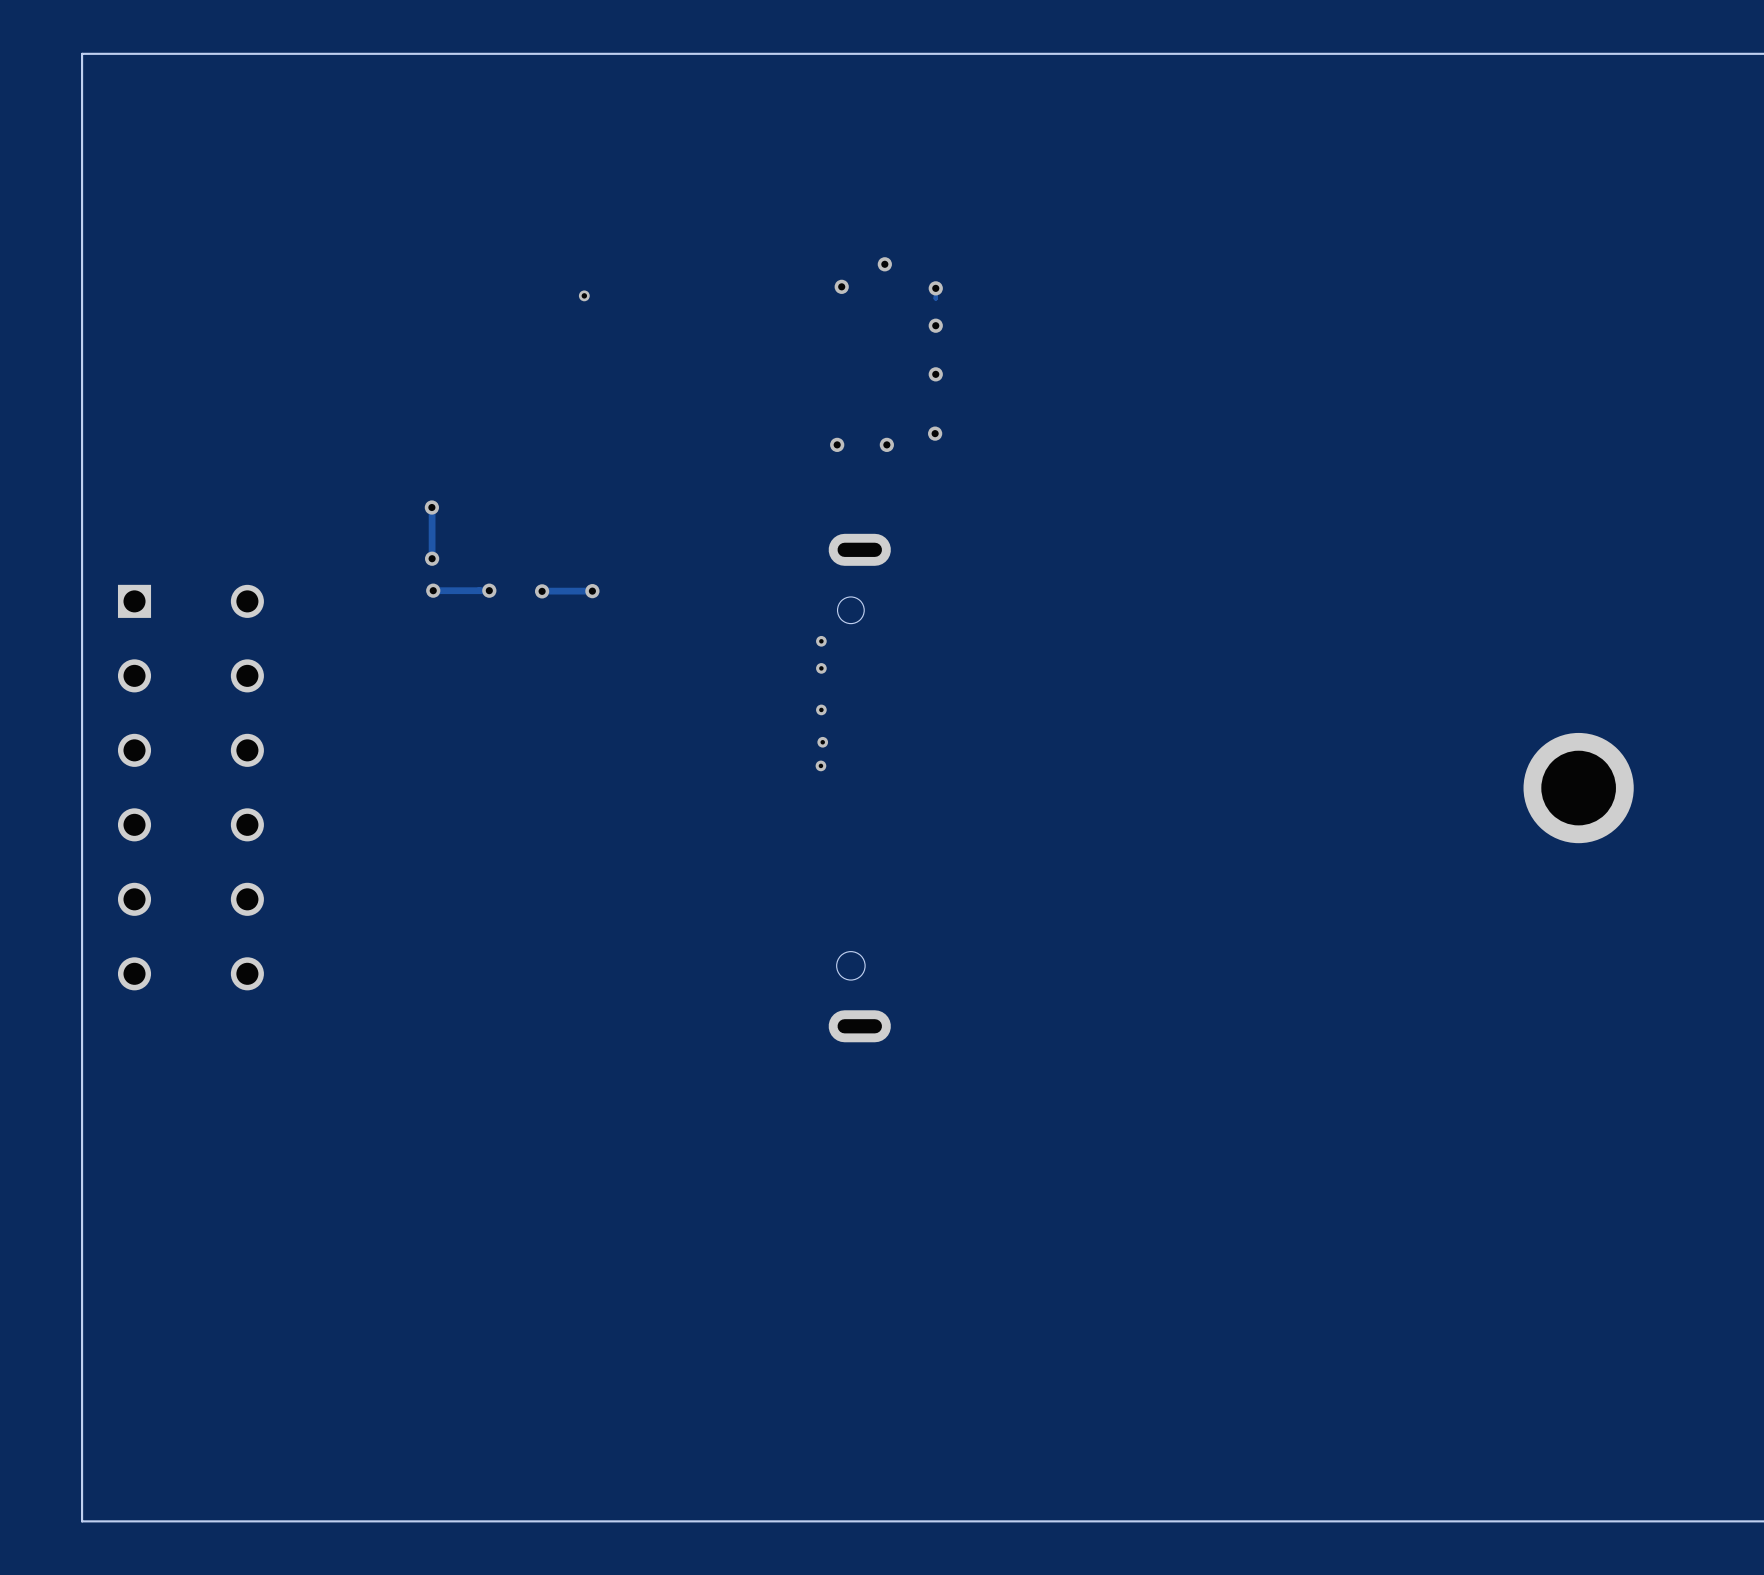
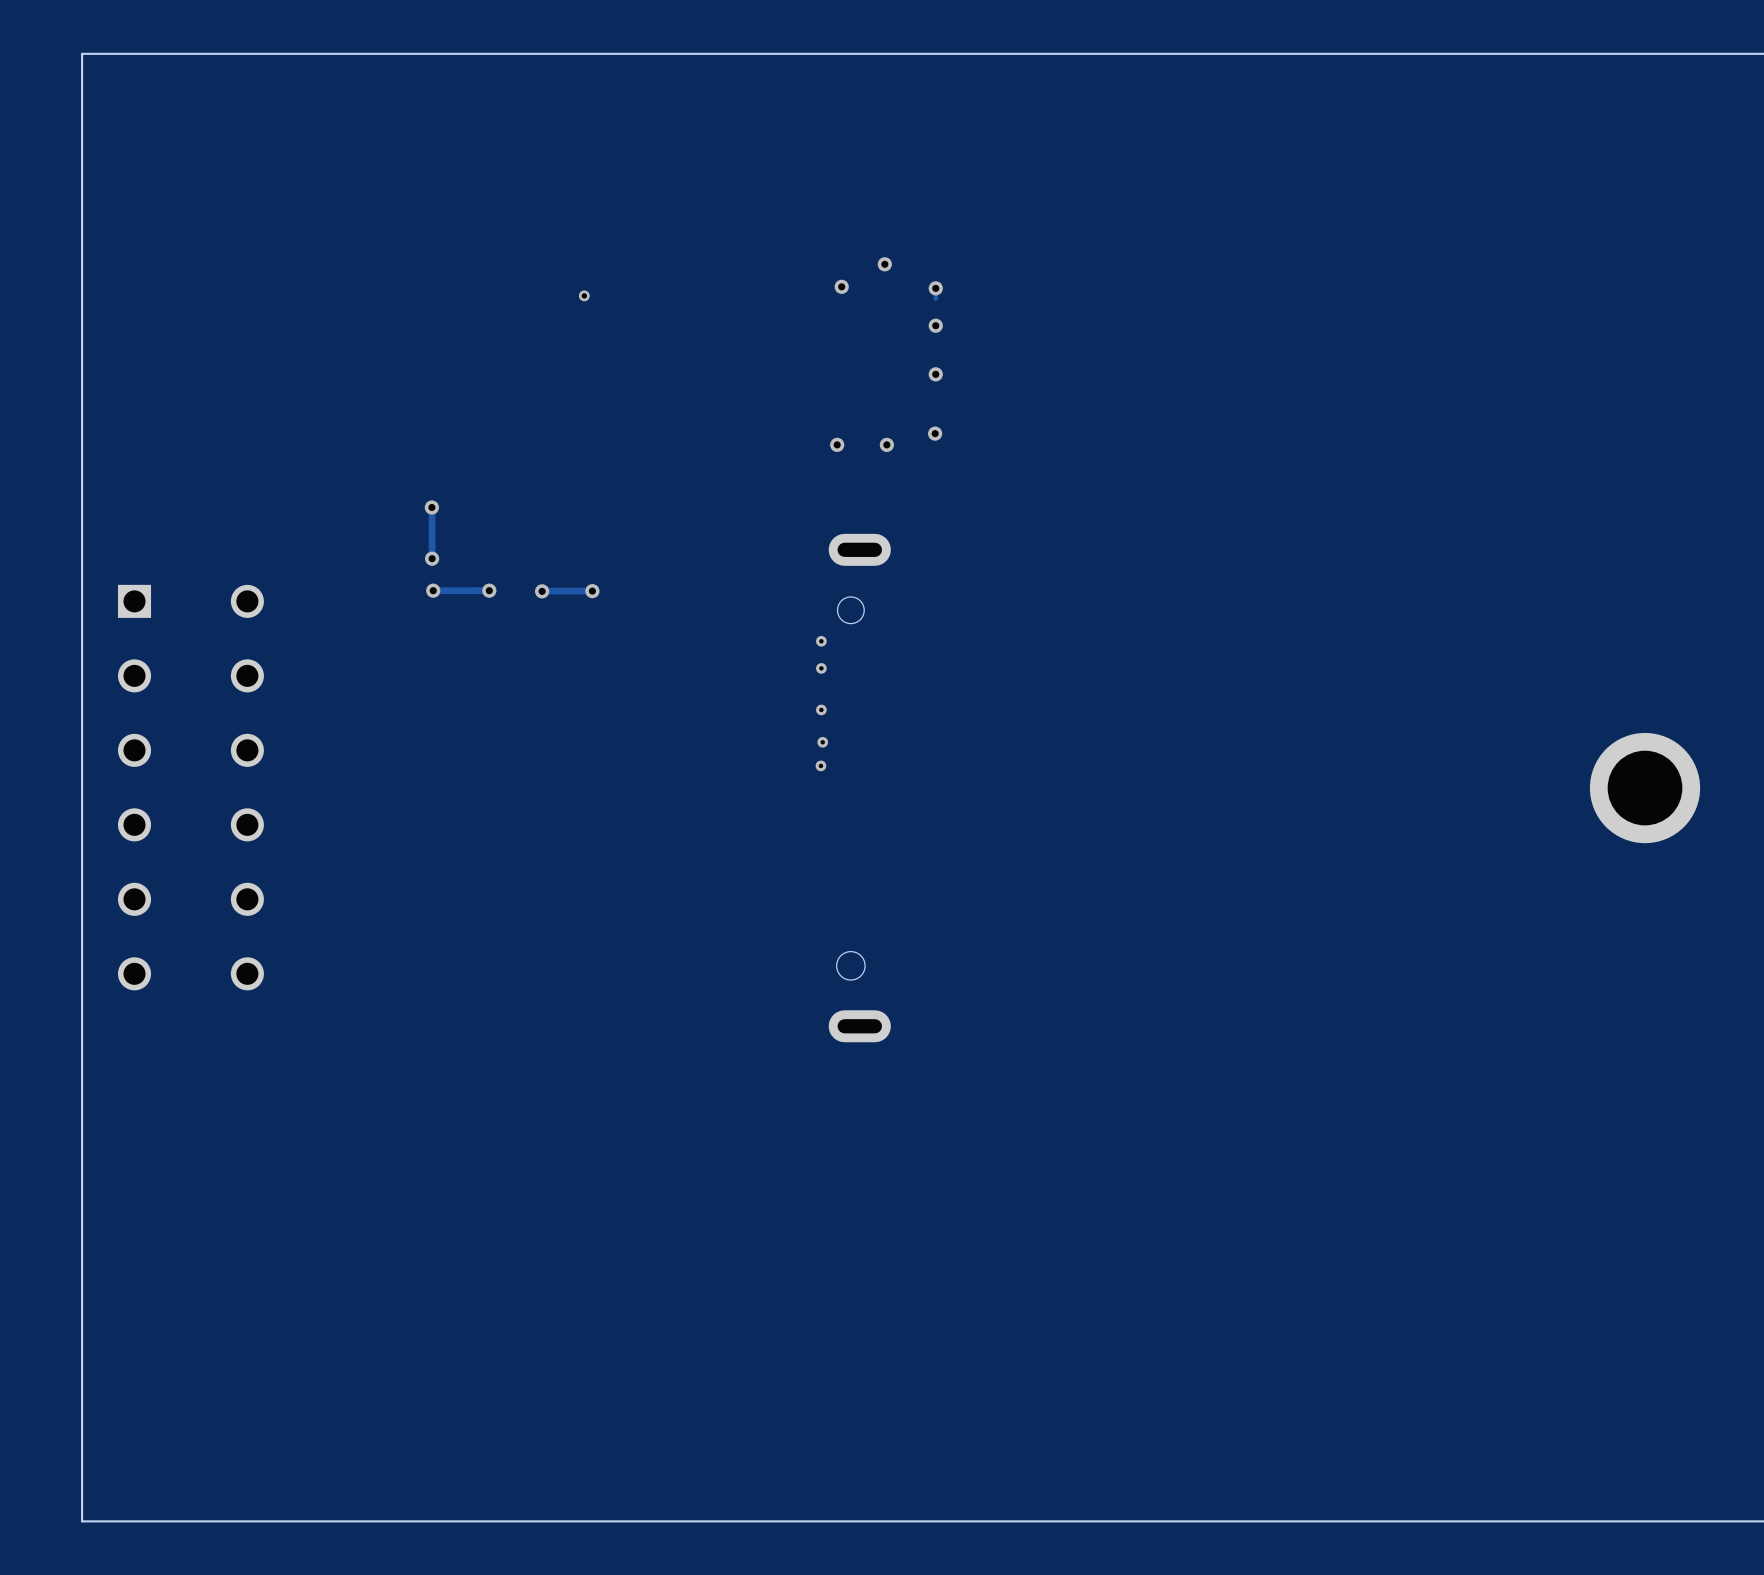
part position: (1578, 788) -> (1645, 788)

